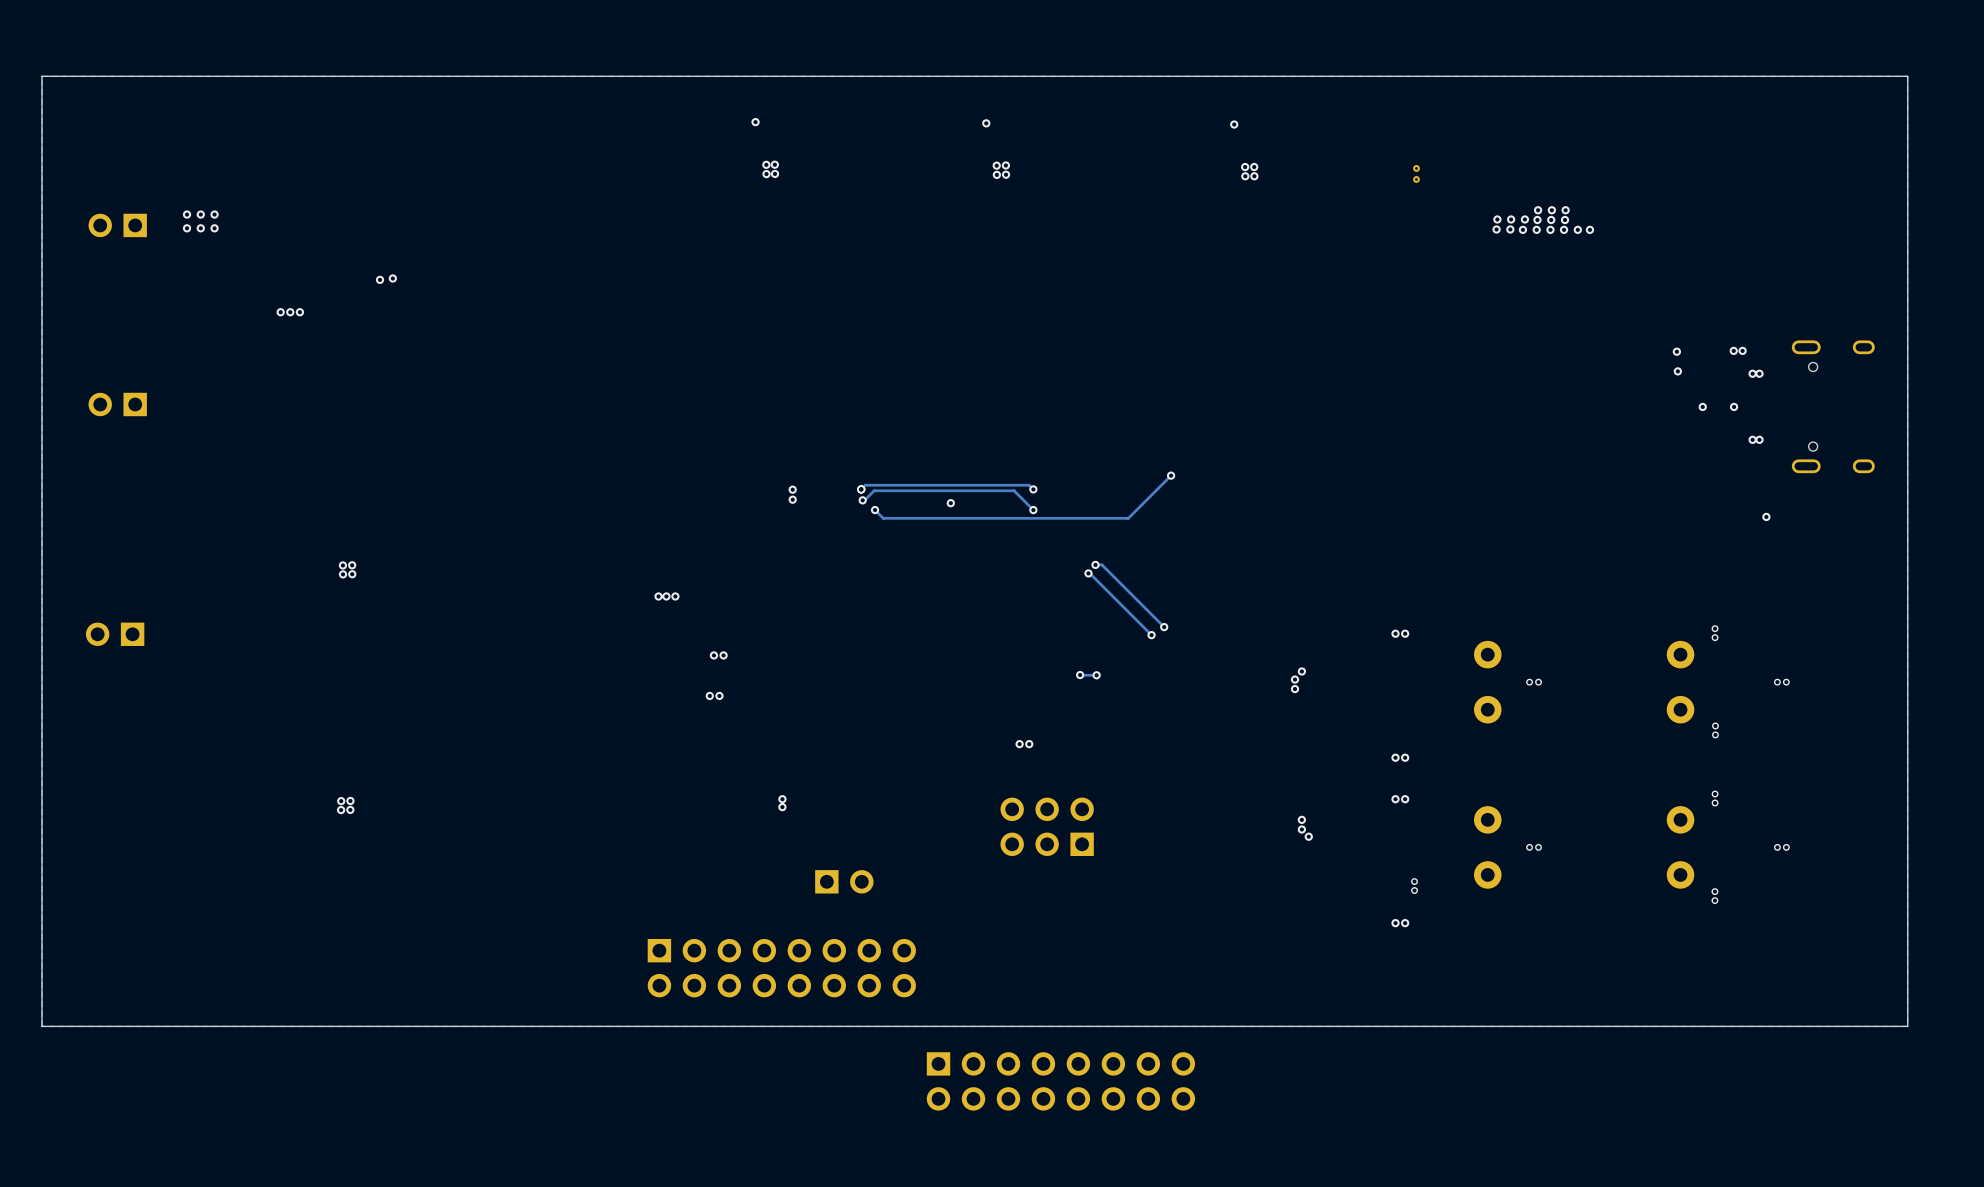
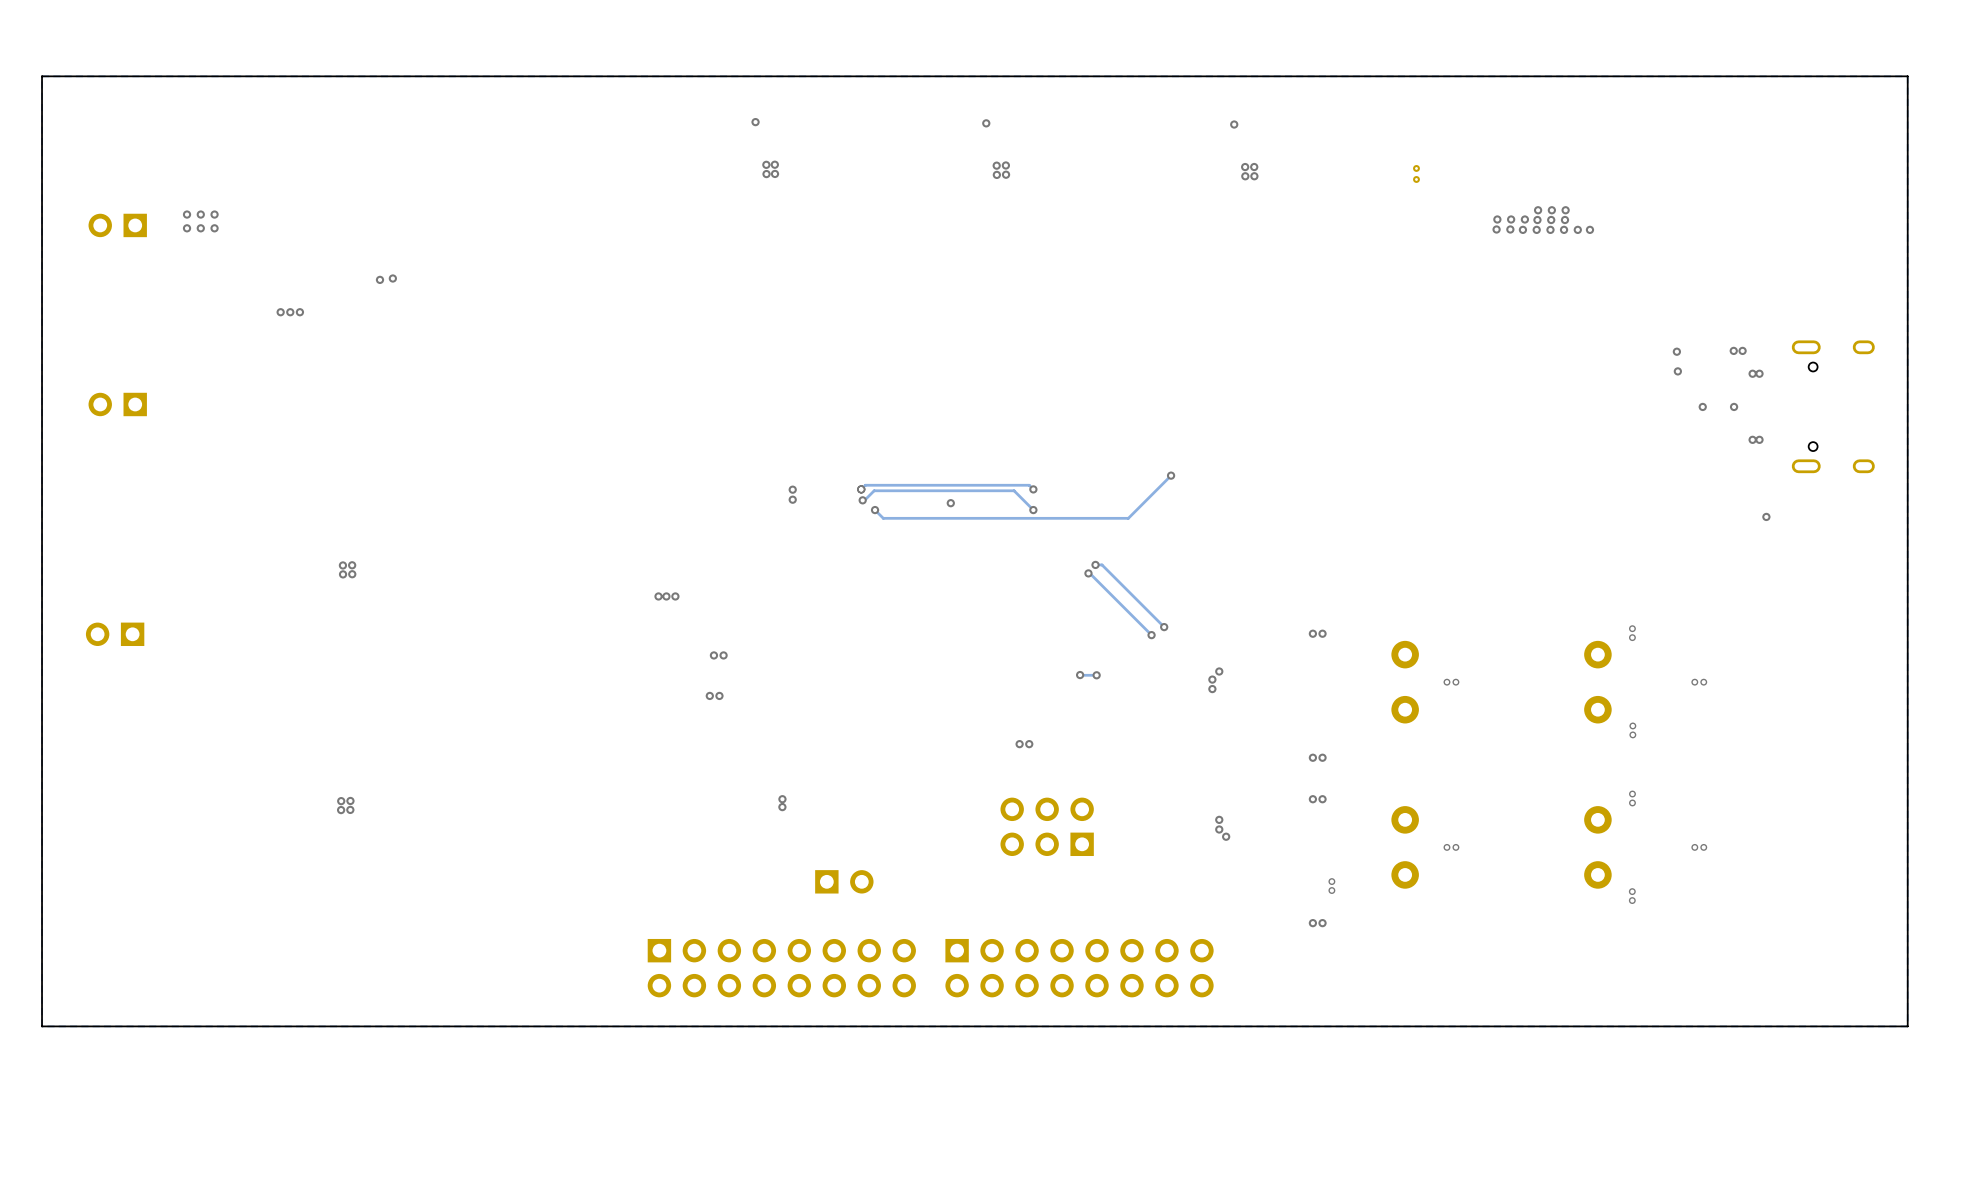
via: none -> (1632, 628)
via: (1715, 628) -> none
via: none -> (1312, 633)
via: none -> (1322, 633)
via: (1395, 633) -> none
via: (1405, 633) -> none
via: none -> (1632, 637)
via: (1715, 637) -> none
part: none -> (1405, 654)
part: (1487, 654) -> none
part: none -> (1597, 654)
part: (1680, 654) -> none
via: none -> (1219, 671)
via: (1301, 671) -> none
via: none -> (1212, 679)
via: (1294, 679) -> none
via: none -> (1446, 682)
via: none -> (1455, 682)
via: (1529, 682) -> none
via: (1538, 682) -> none
via: none -> (1694, 682)
via: none -> (1703, 682)
via: (1777, 682) -> none
via: (1786, 682) -> none
via: none -> (1212, 689)
via: (1294, 689) -> none
part: none -> (1405, 709)
part: (1487, 709) -> none
part: none -> (1597, 709)
part: (1680, 709) -> none
via: none -> (1632, 725)
via: (1715, 725) -> none
via: none -> (1632, 734)
via: (1715, 734) -> none
via: none -> (1312, 757)
via: none -> (1322, 757)
via: (1395, 757) -> none
via: (1405, 757) -> none
via: none -> (1632, 794)
via: (1715, 794) -> none
via: none -> (1312, 799)
via: none -> (1322, 799)
via: (1395, 799) -> none
via: (1405, 799) -> none
via: none -> (1632, 802)
via: (1715, 802) -> none
via: none -> (1219, 819)
via: (1301, 819) -> none
part: none -> (1405, 819)
part: (1487, 819) -> none
part: none -> (1597, 819)
part: (1680, 819) -> none
via: none -> (1219, 829)
via: (1301, 829) -> none
via: none -> (1226, 836)
via: (1308, 836) -> none
via: none -> (1446, 847)
via: none -> (1455, 847)
via: (1529, 847) -> none
via: (1538, 847) -> none
via: none -> (1694, 847)
via: none -> (1703, 847)
via: (1777, 847) -> none
via: (1786, 847) -> none
part: none -> (1405, 874)
part: (1487, 874) -> none
part: none -> (1597, 874)
part: (1680, 874) -> none
via: none -> (1331, 881)
via: (1414, 881) -> none
via: none -> (1331, 890)
via: (1414, 890) -> none
via: none -> (1632, 891)
via: (1714, 891) -> none
via: none -> (1632, 900)
via: (1714, 900) -> none
via: none -> (1312, 923)
via: none -> (1322, 923)
via: (1395, 923) -> none
via: (1405, 923) -> none
part position: (1060, 1081) -> (1079, 968)

